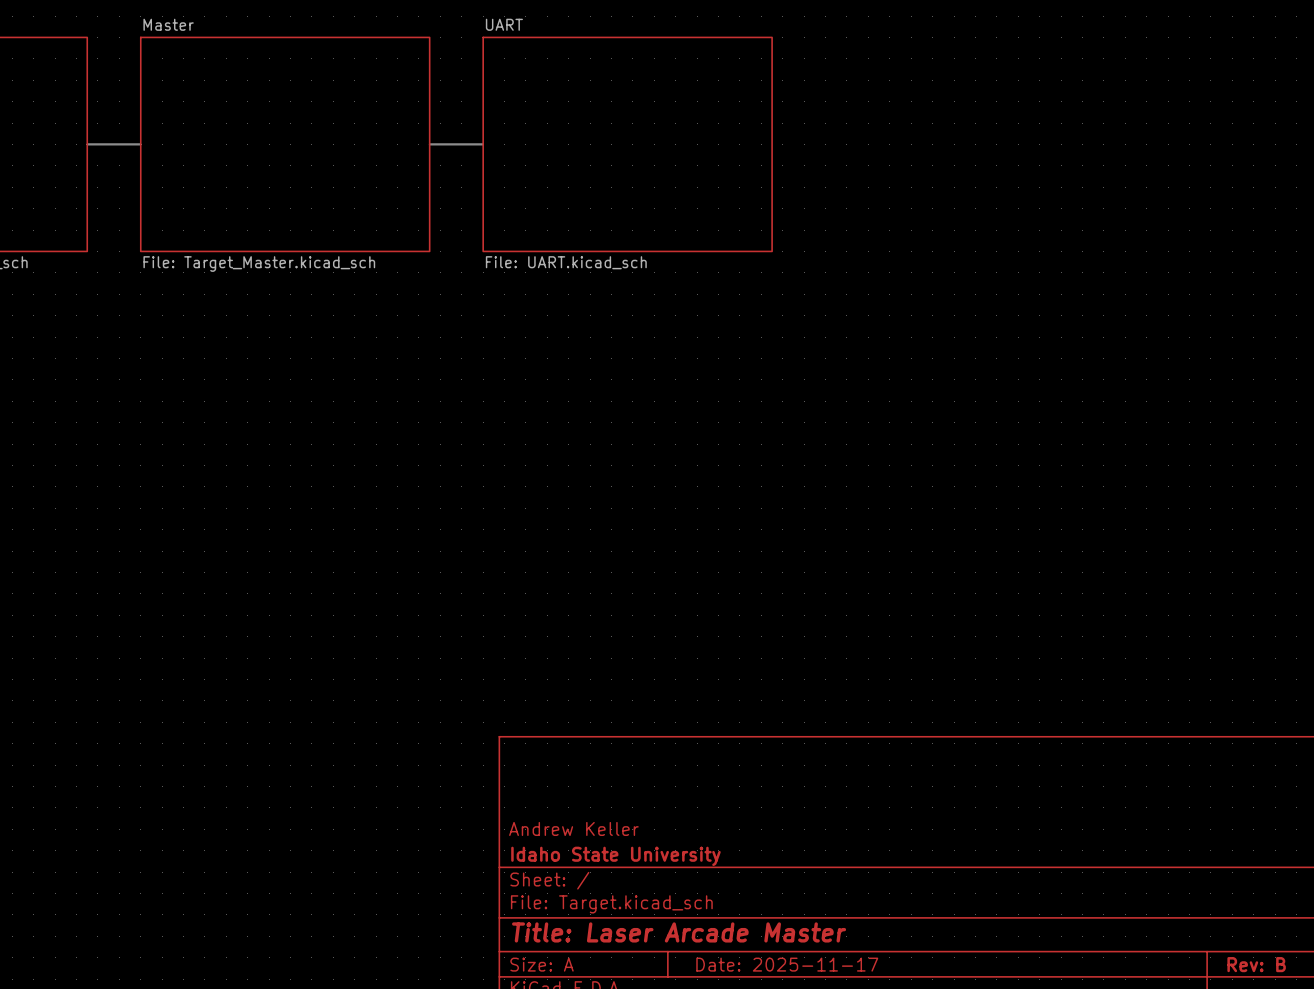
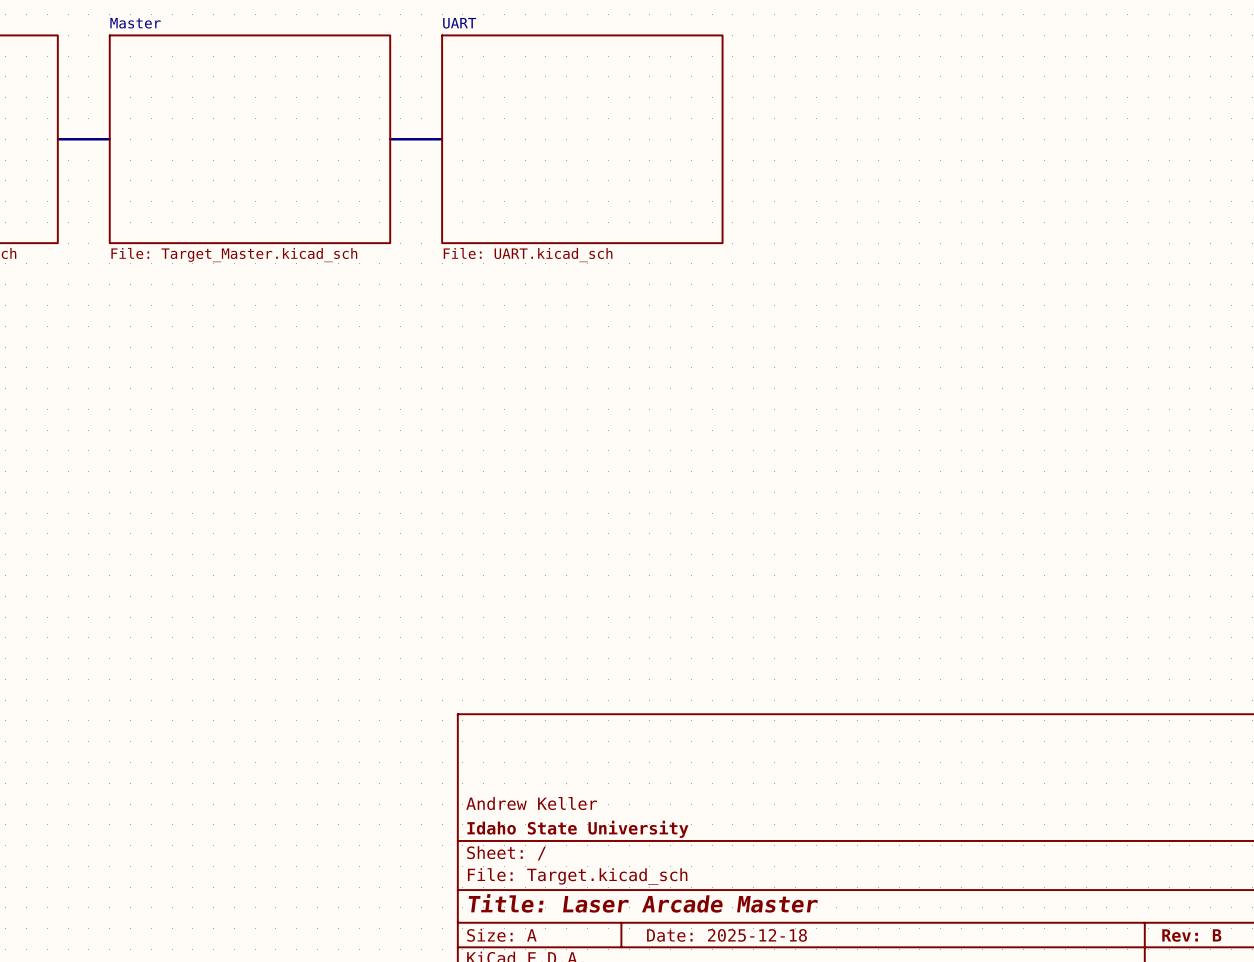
title block: Date: 2025-11-17 (787, 964) -> Date: 2025-12-18 (726, 935)

